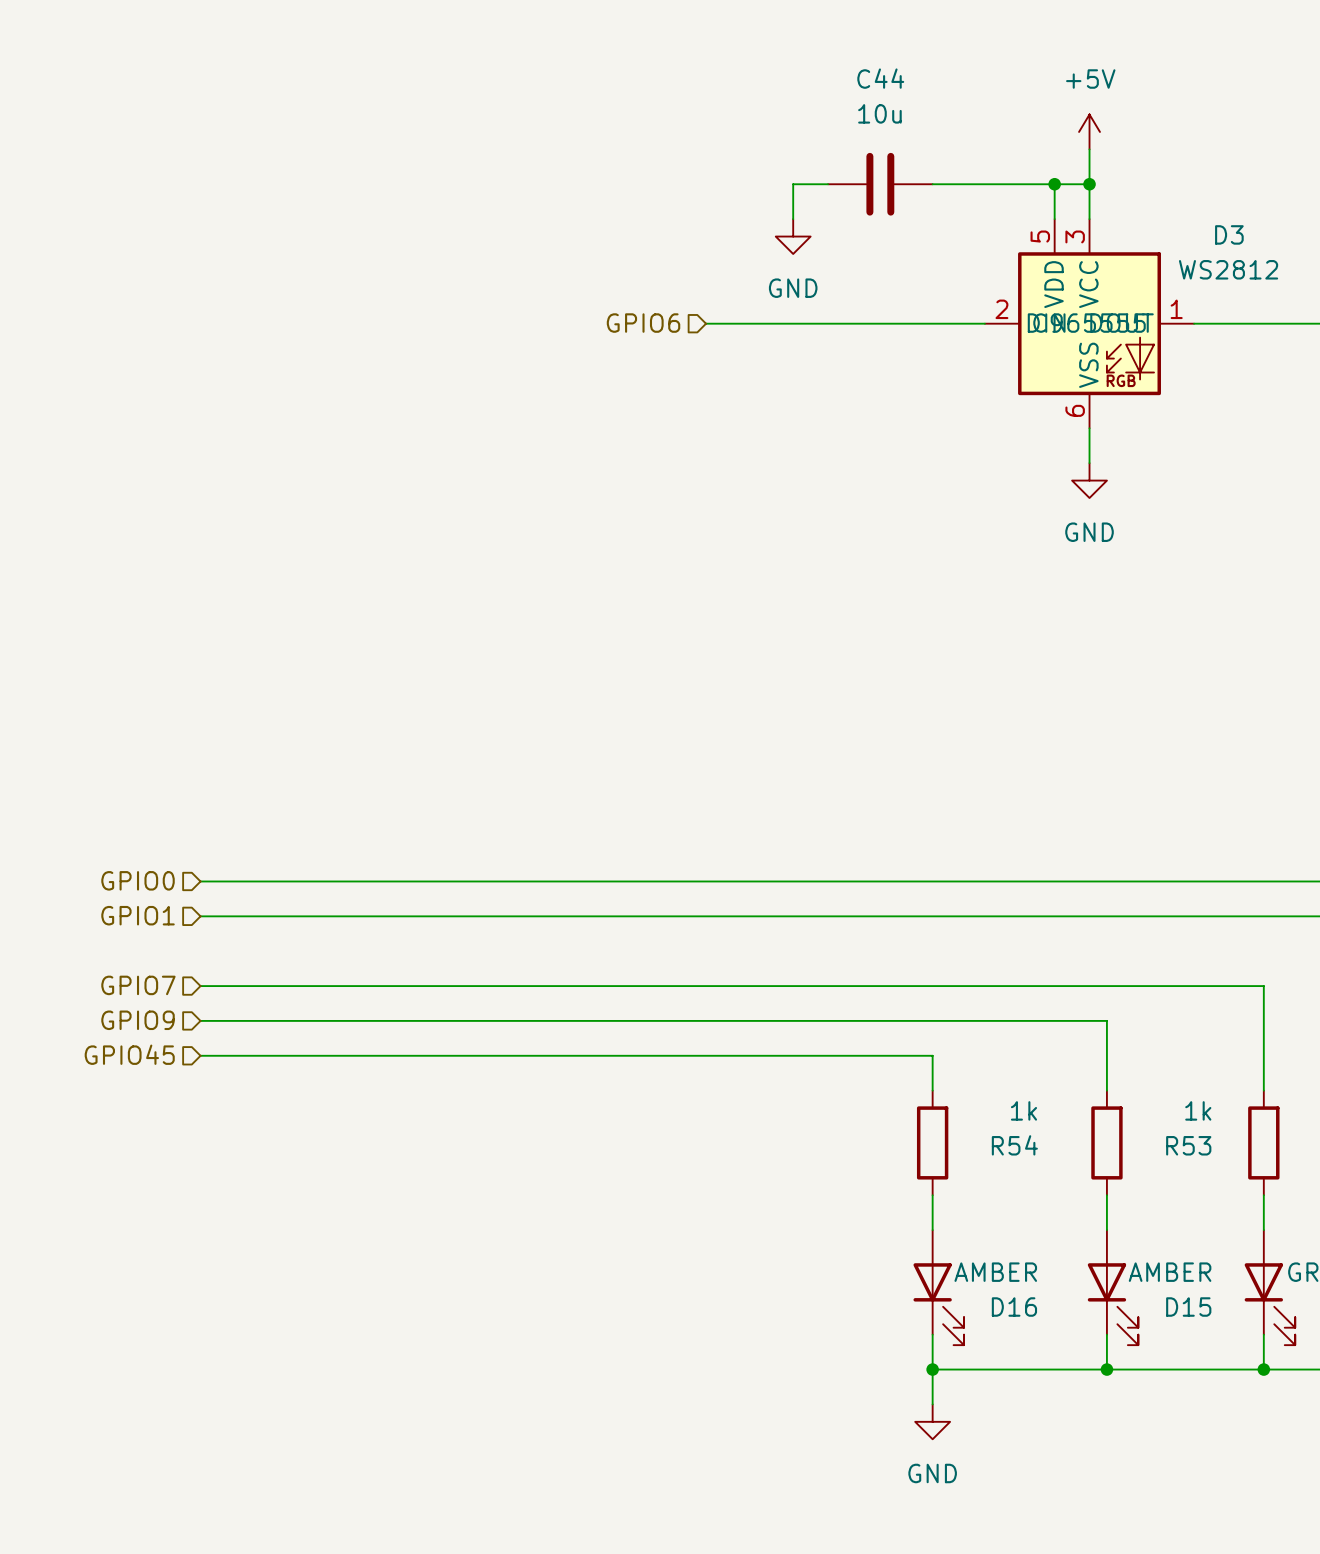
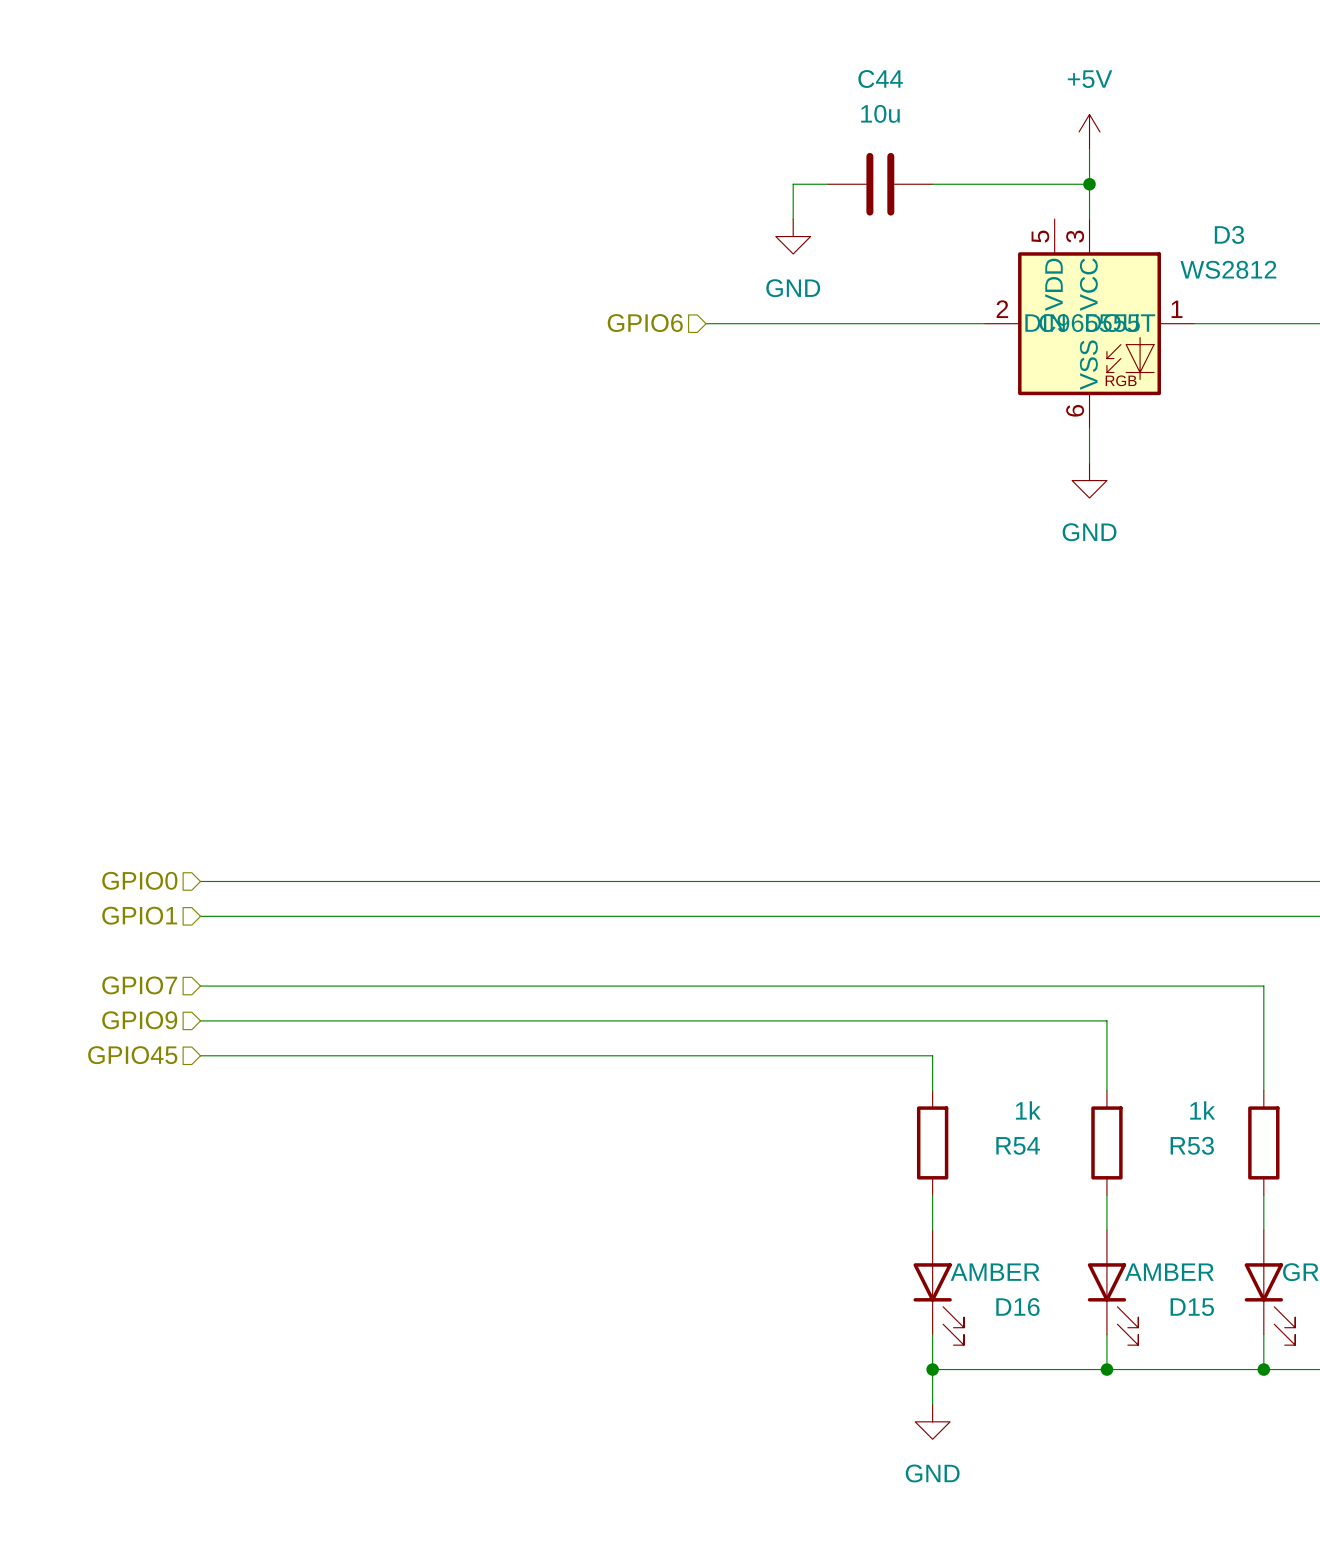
wire: (1054, 184) (1054, 219) -> none
junction: (1054, 184) -> none

